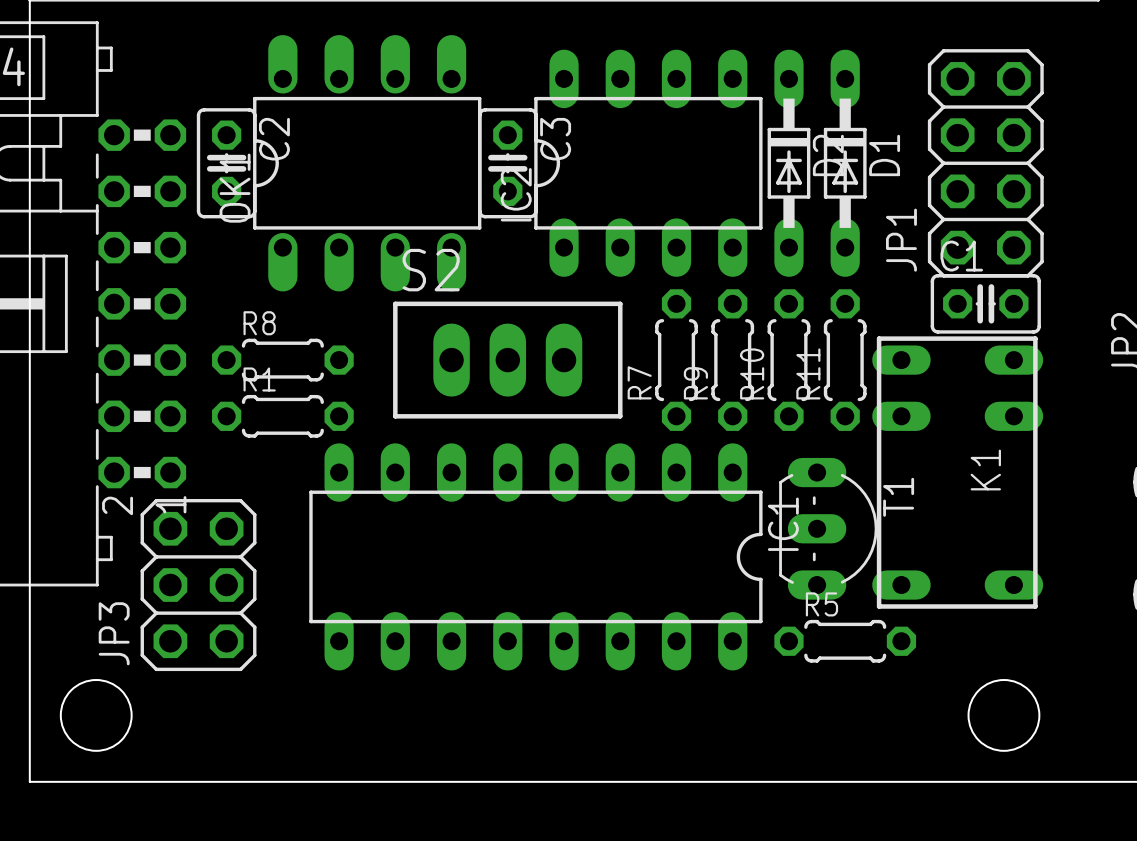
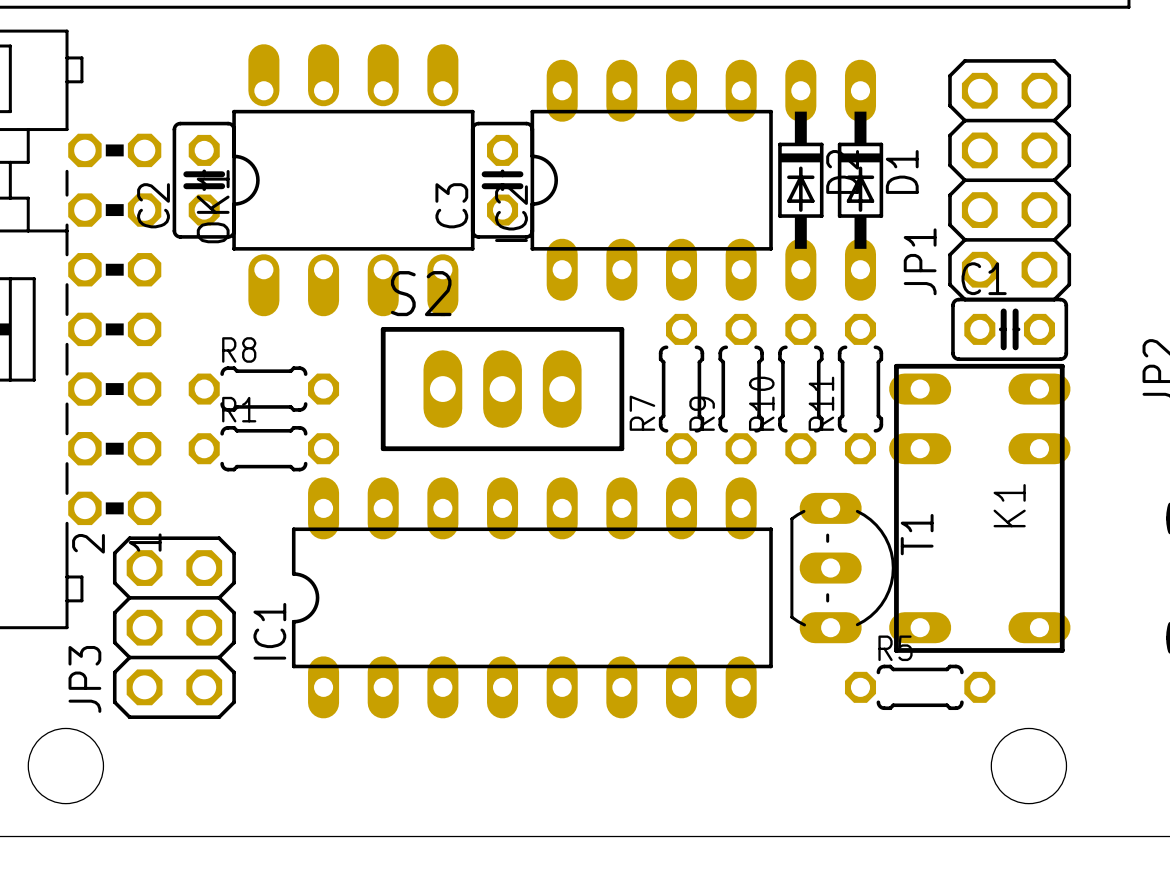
C2 name position: C2 (274, 139) -> C2 (153, 205)
C3 name position: C3 (555, 139) -> C3 (451, 205)
IC1 rotation: 0° (535, 556) -> 180° (532, 597)
R5 position: (845, 641) -> (920, 687)

